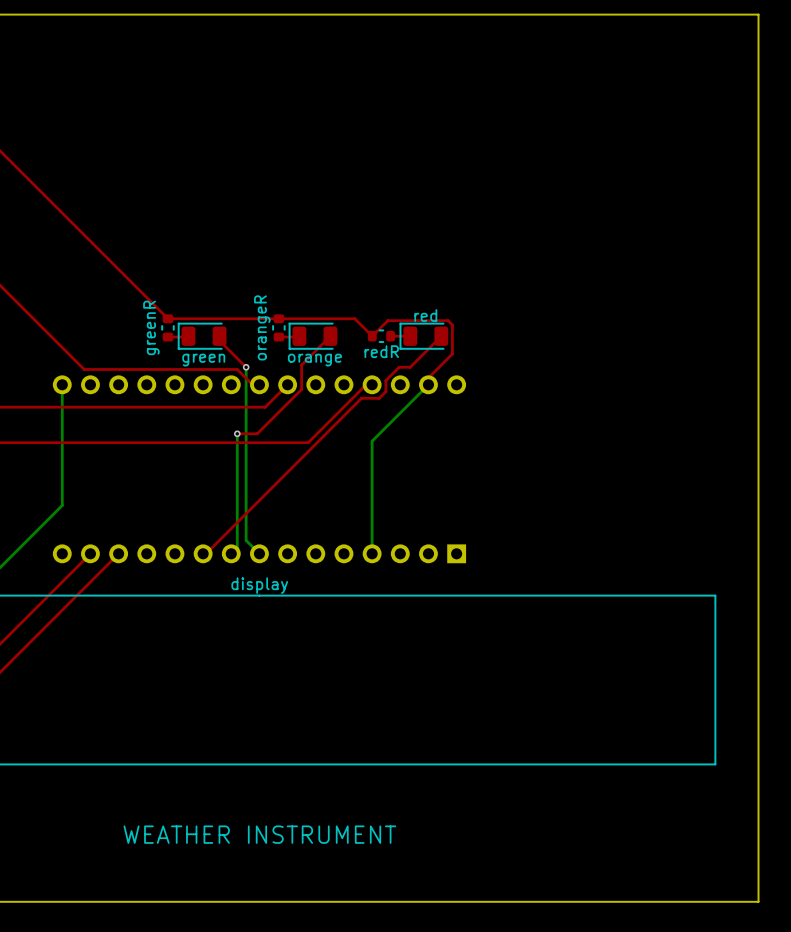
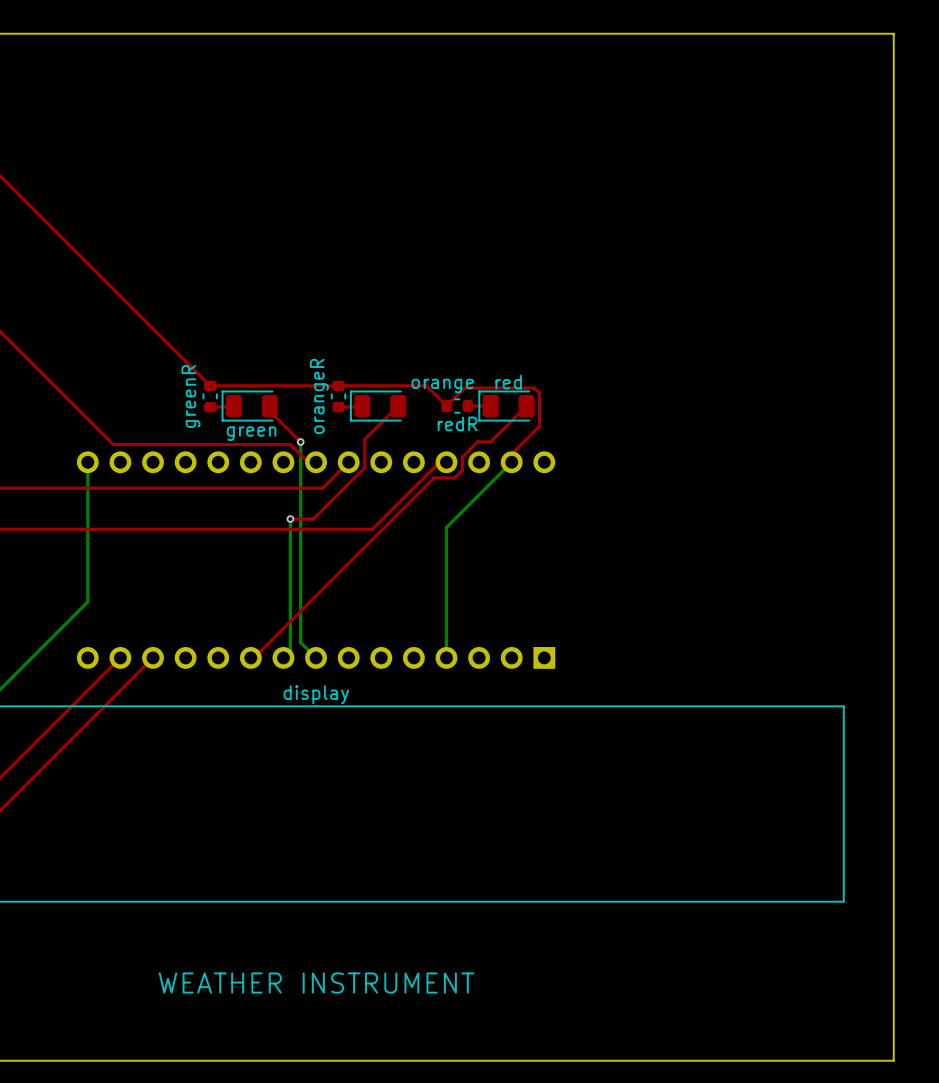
orange name position: orange (314, 360) -> orange (442, 386)

